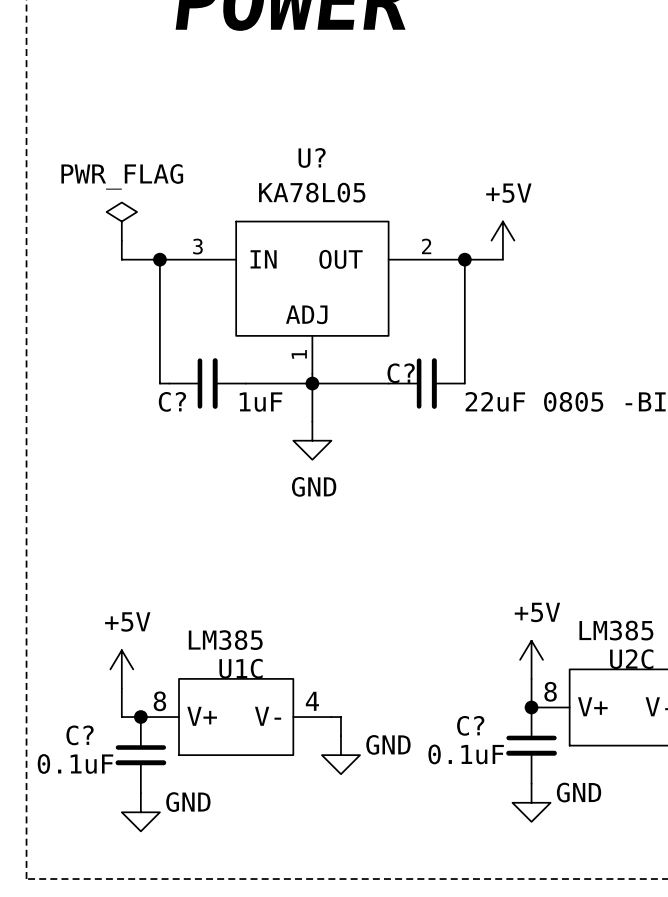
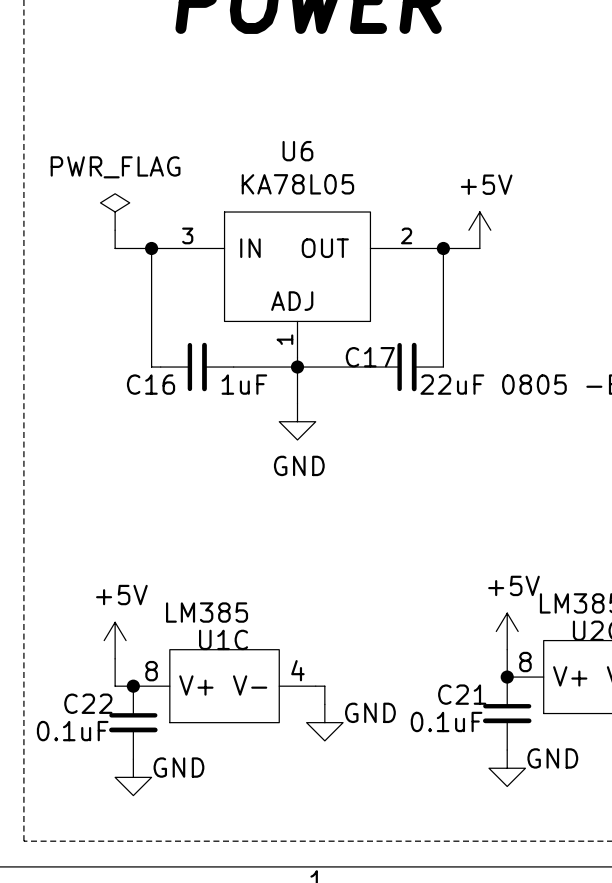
U? name: U? (312, 157) -> U6 (297, 151)
C? name: C? (401, 373) -> C17 (370, 357)
C? name: C? (172, 401) -> C16 (151, 384)
C? name: C? (470, 725) -> C21 (462, 694)
C? name: C? (80, 735) -> C22 (88, 703)

